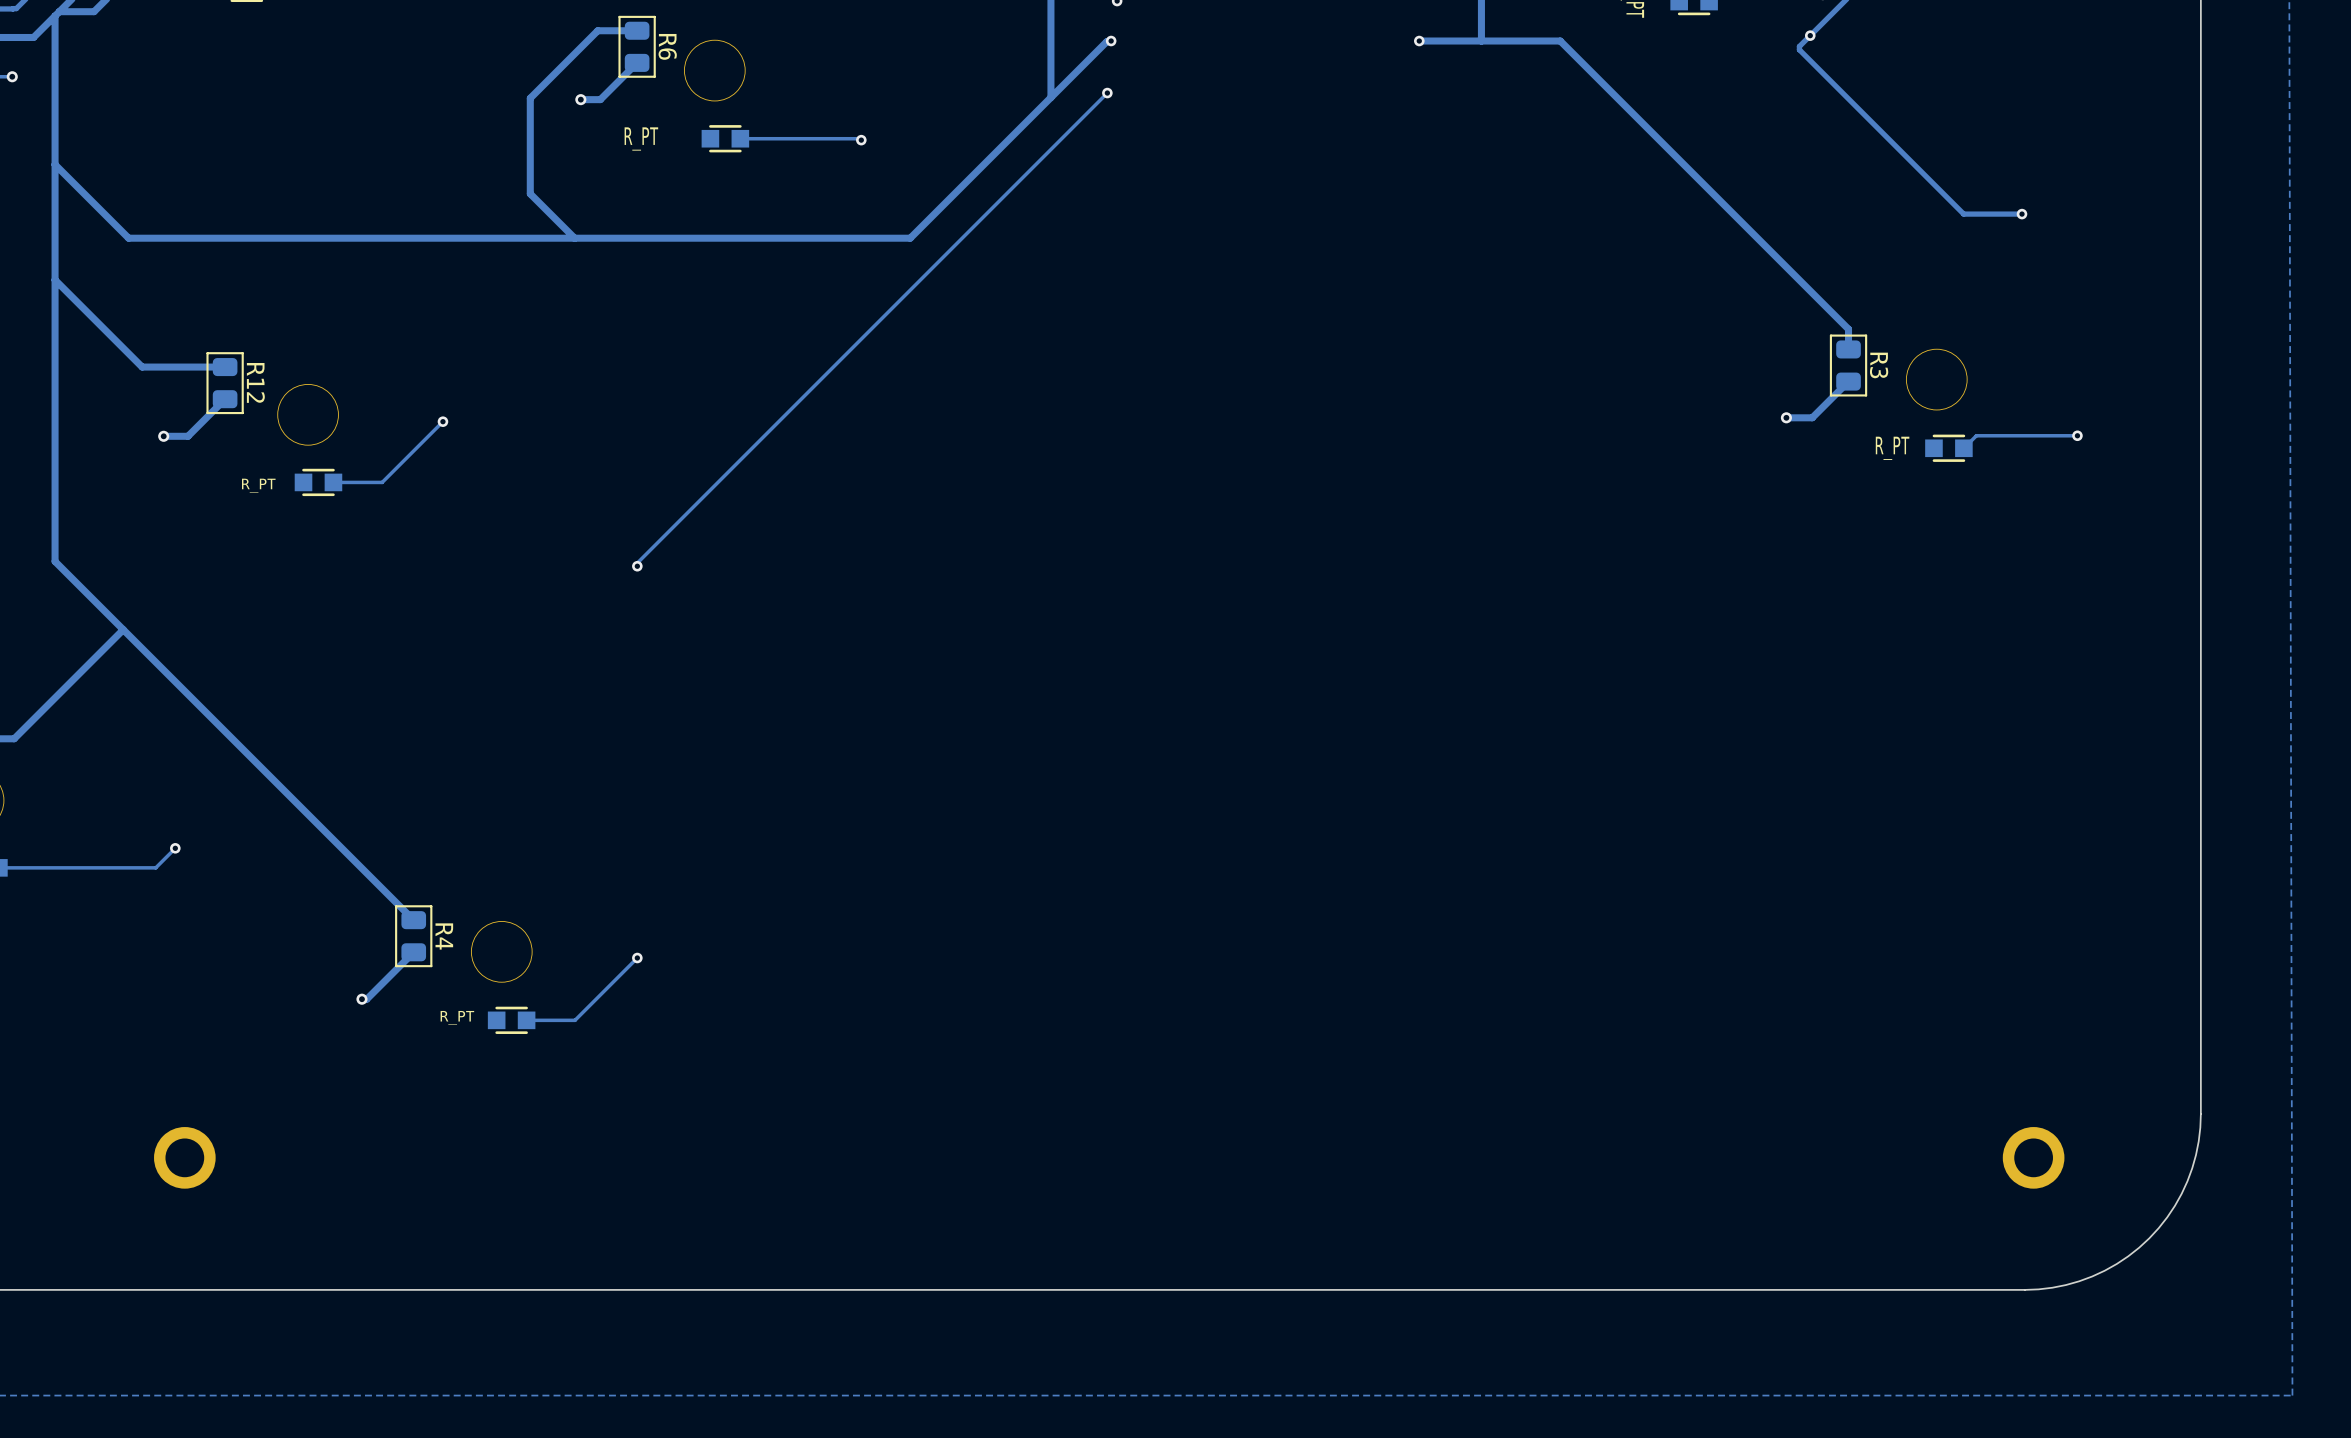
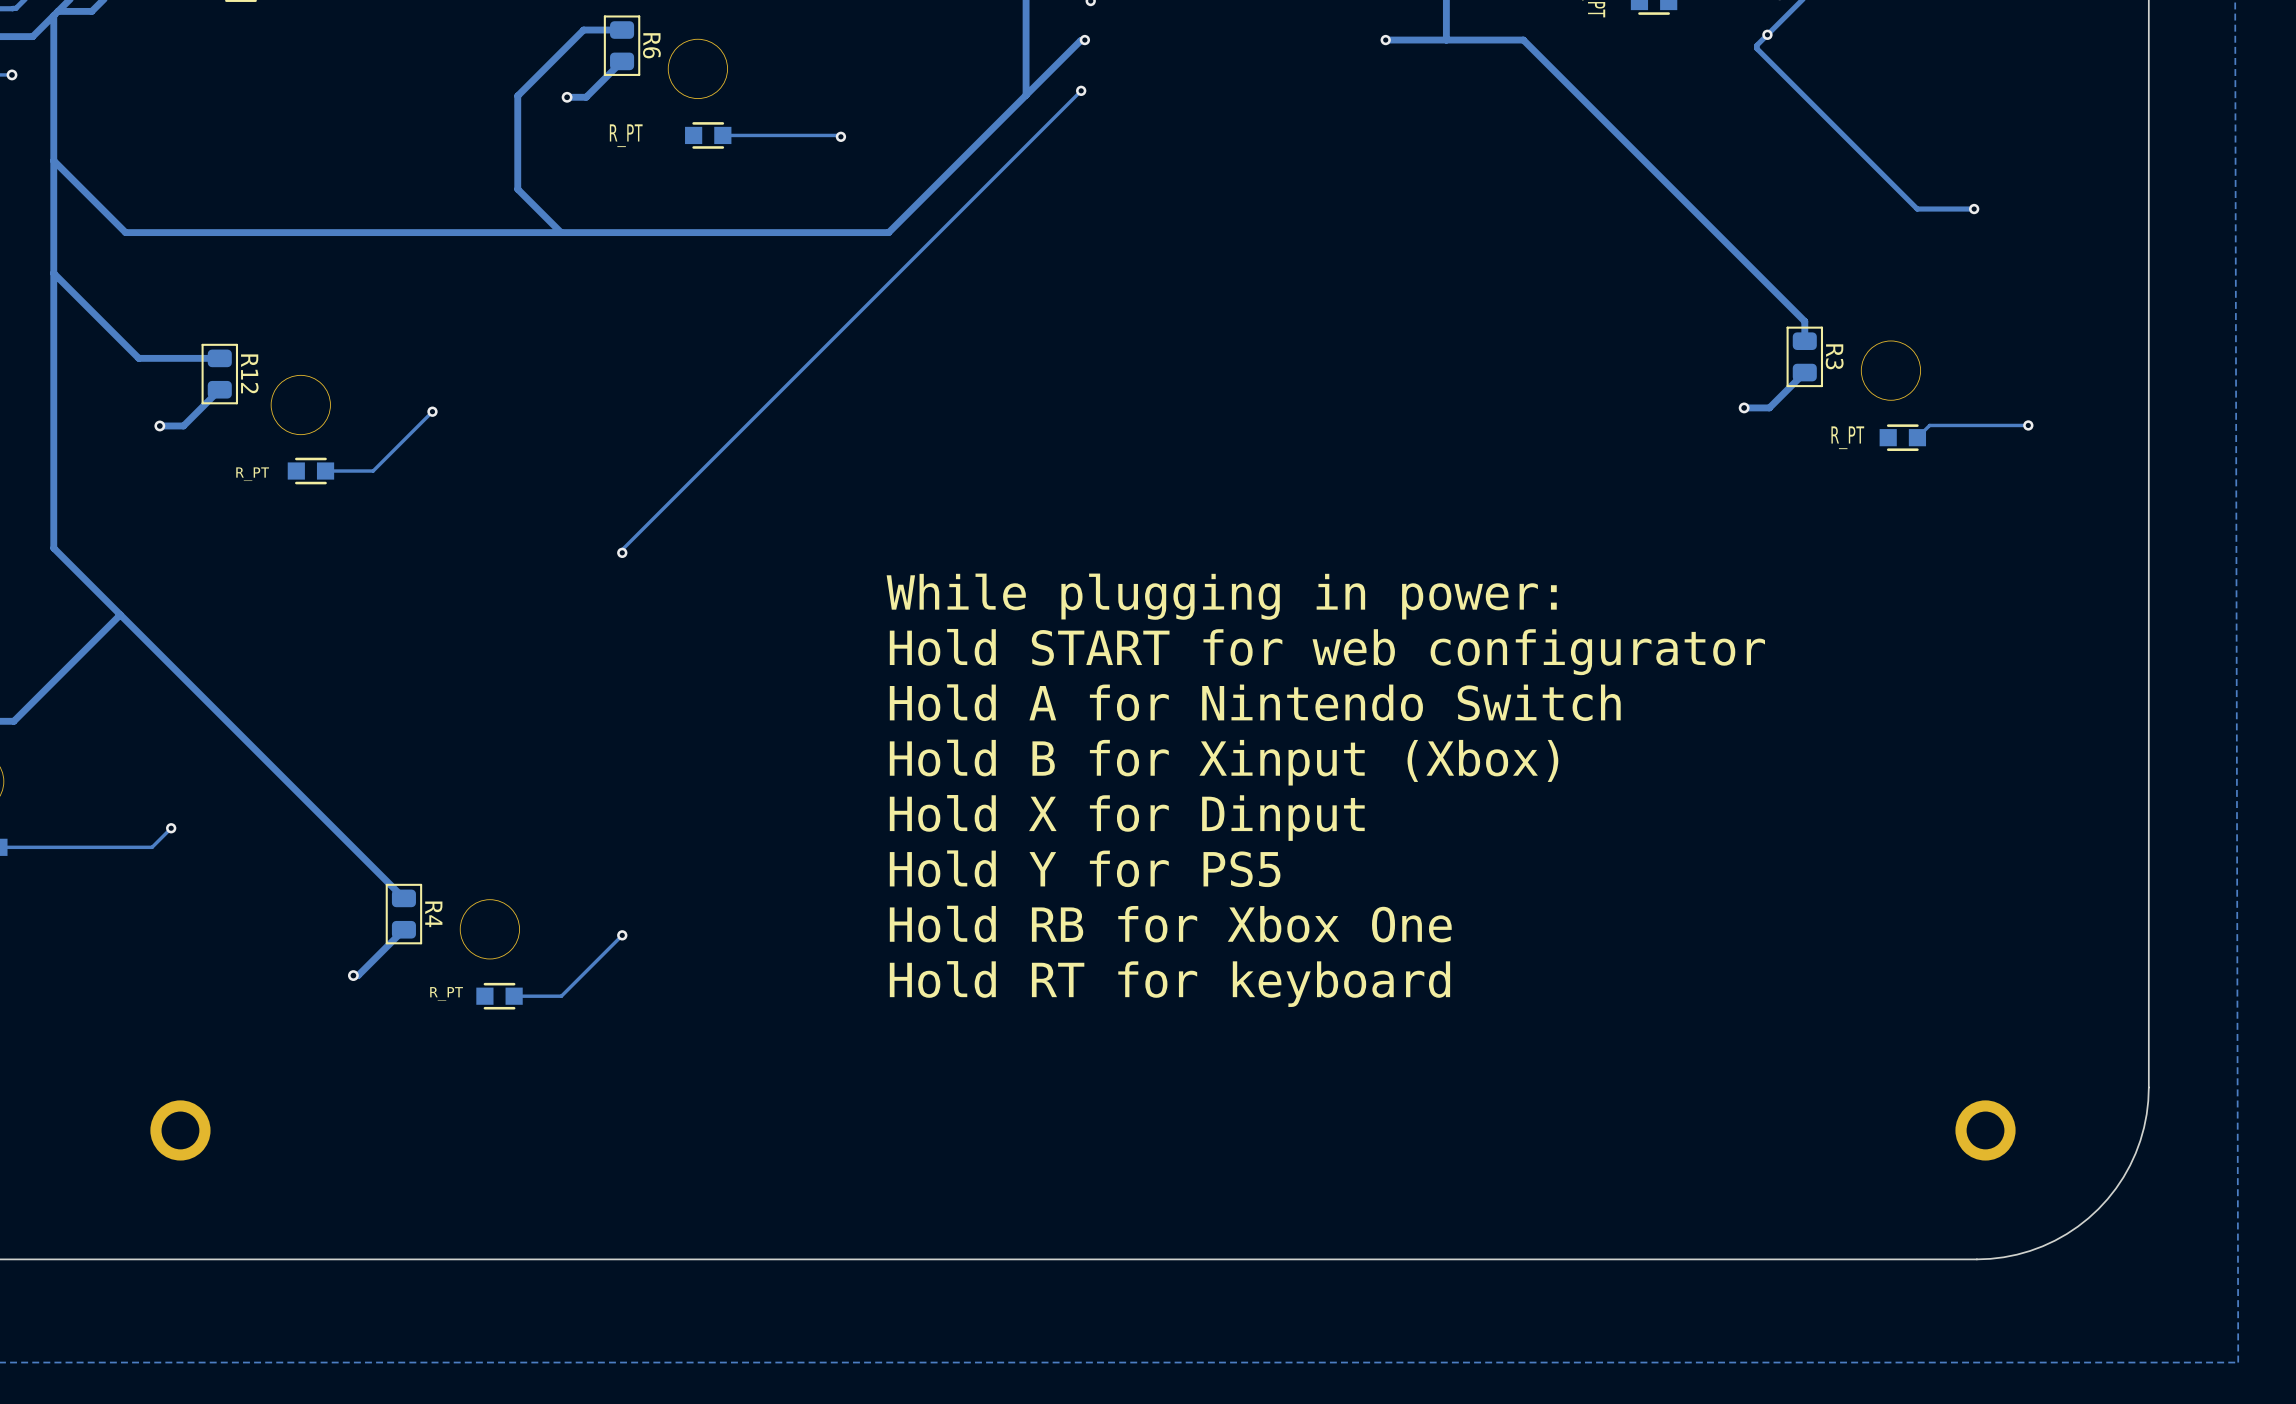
text: none -> While plugging in power: (1221, 596)
text: none -> Hold START for web configurator (1327, 652)
text: none -> Hold A for Nintendo Switch (1255, 702)
text: none -> Hold B for Xinput (Xbox) (1224, 762)
text: none -> Hold X for Dinput (1127, 817)
text: none -> Hold Y for PS5 (1085, 868)
text: none -> Hold RB for Xbox One (1170, 924)
text: none -> Hold RT for keyboard (1169, 984)

